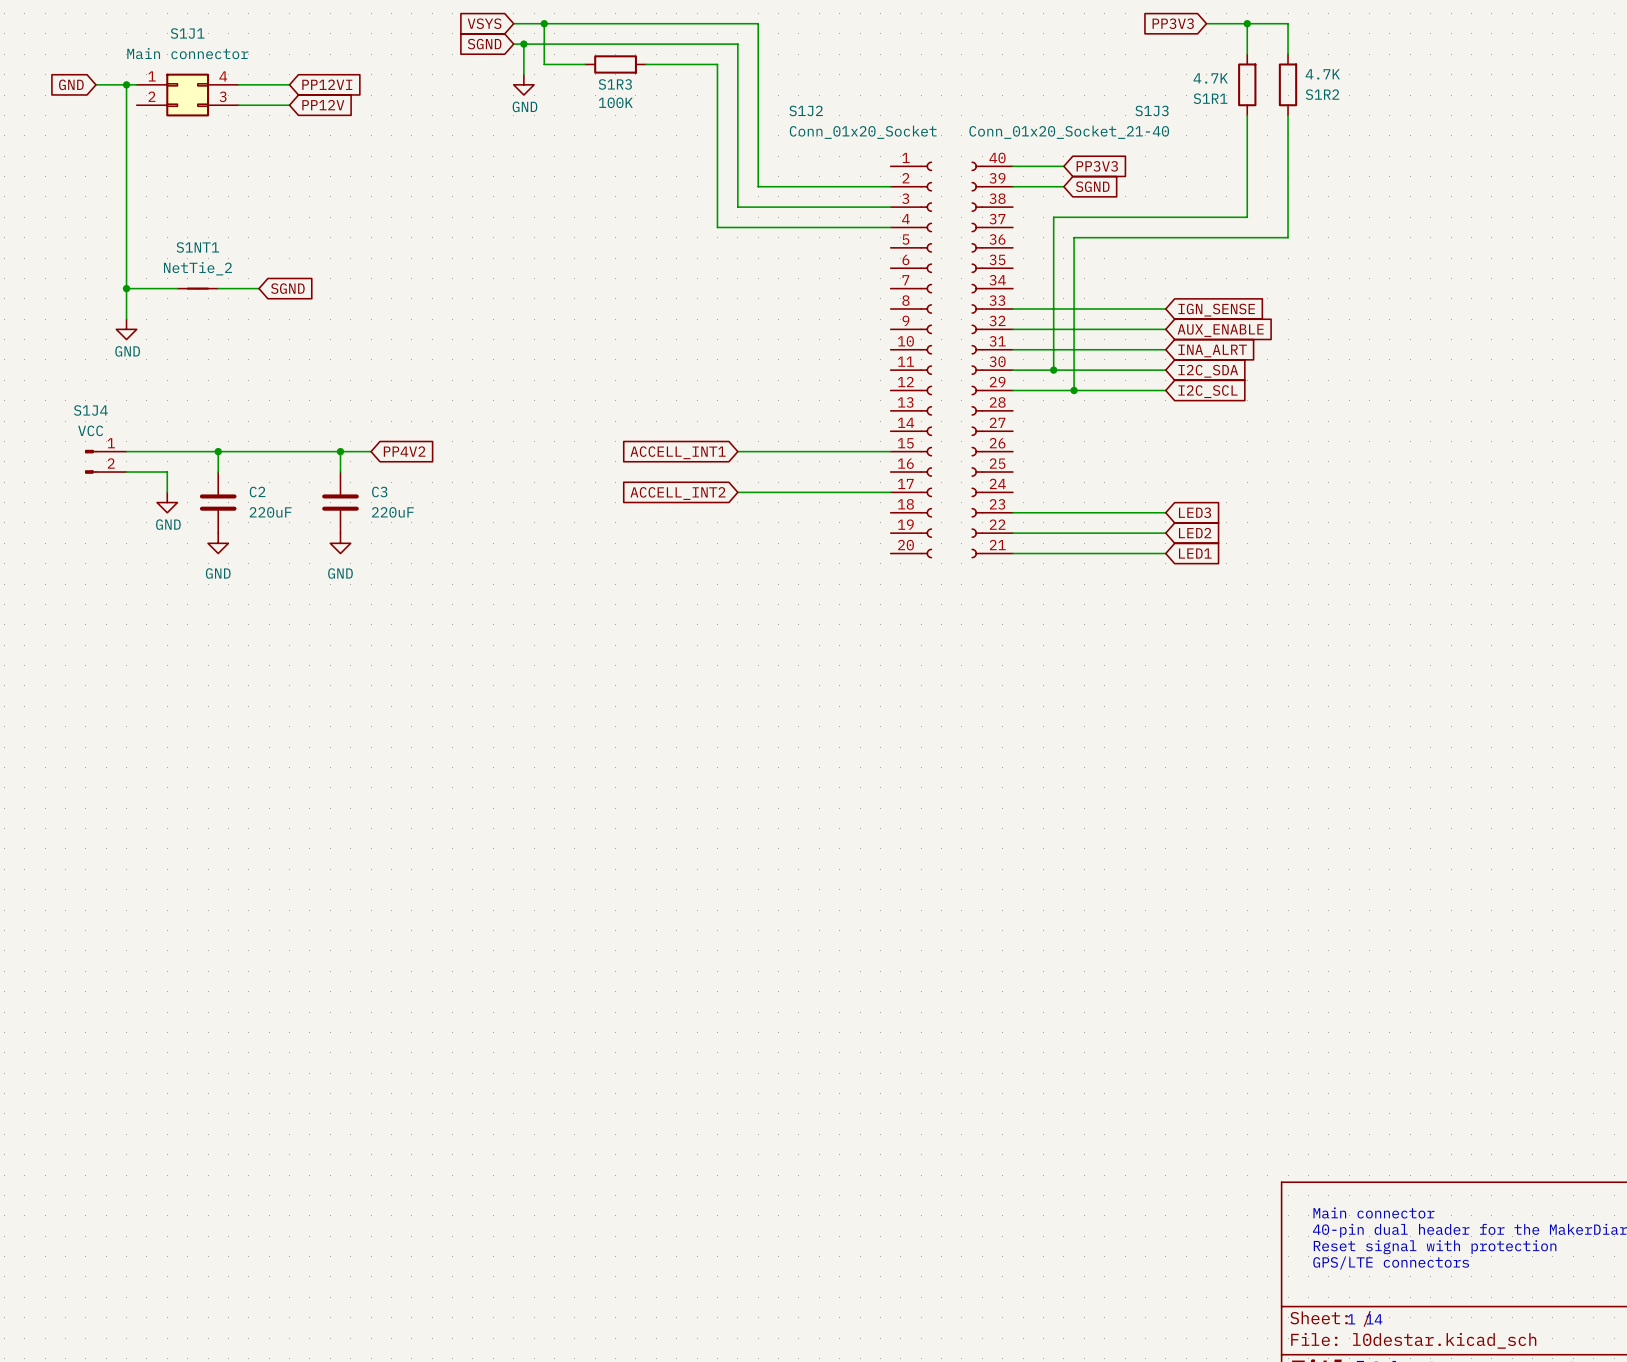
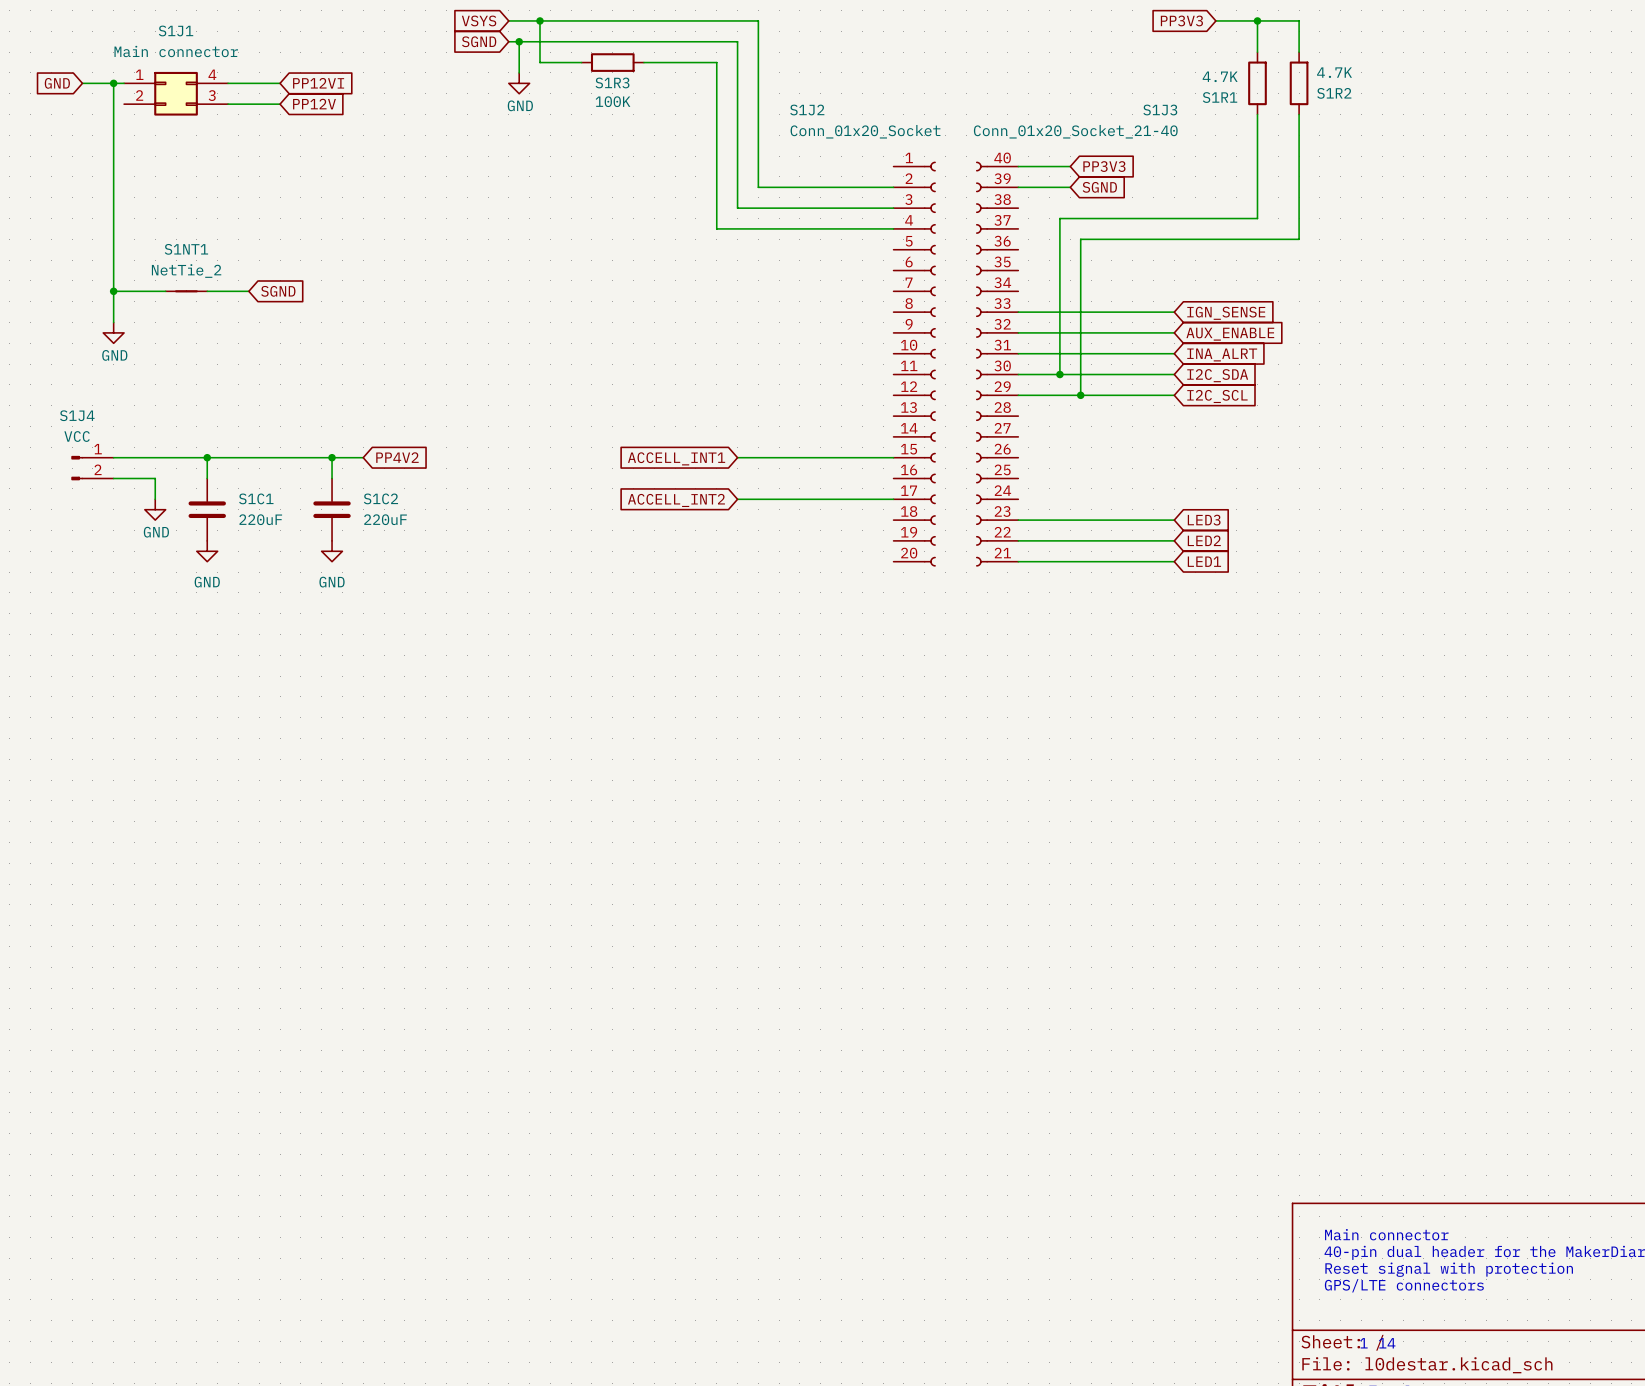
C2 name: C2 (257, 492) -> S1C1 (256, 498)
C3 name: C3 (379, 492) -> S1C2 (380, 498)

